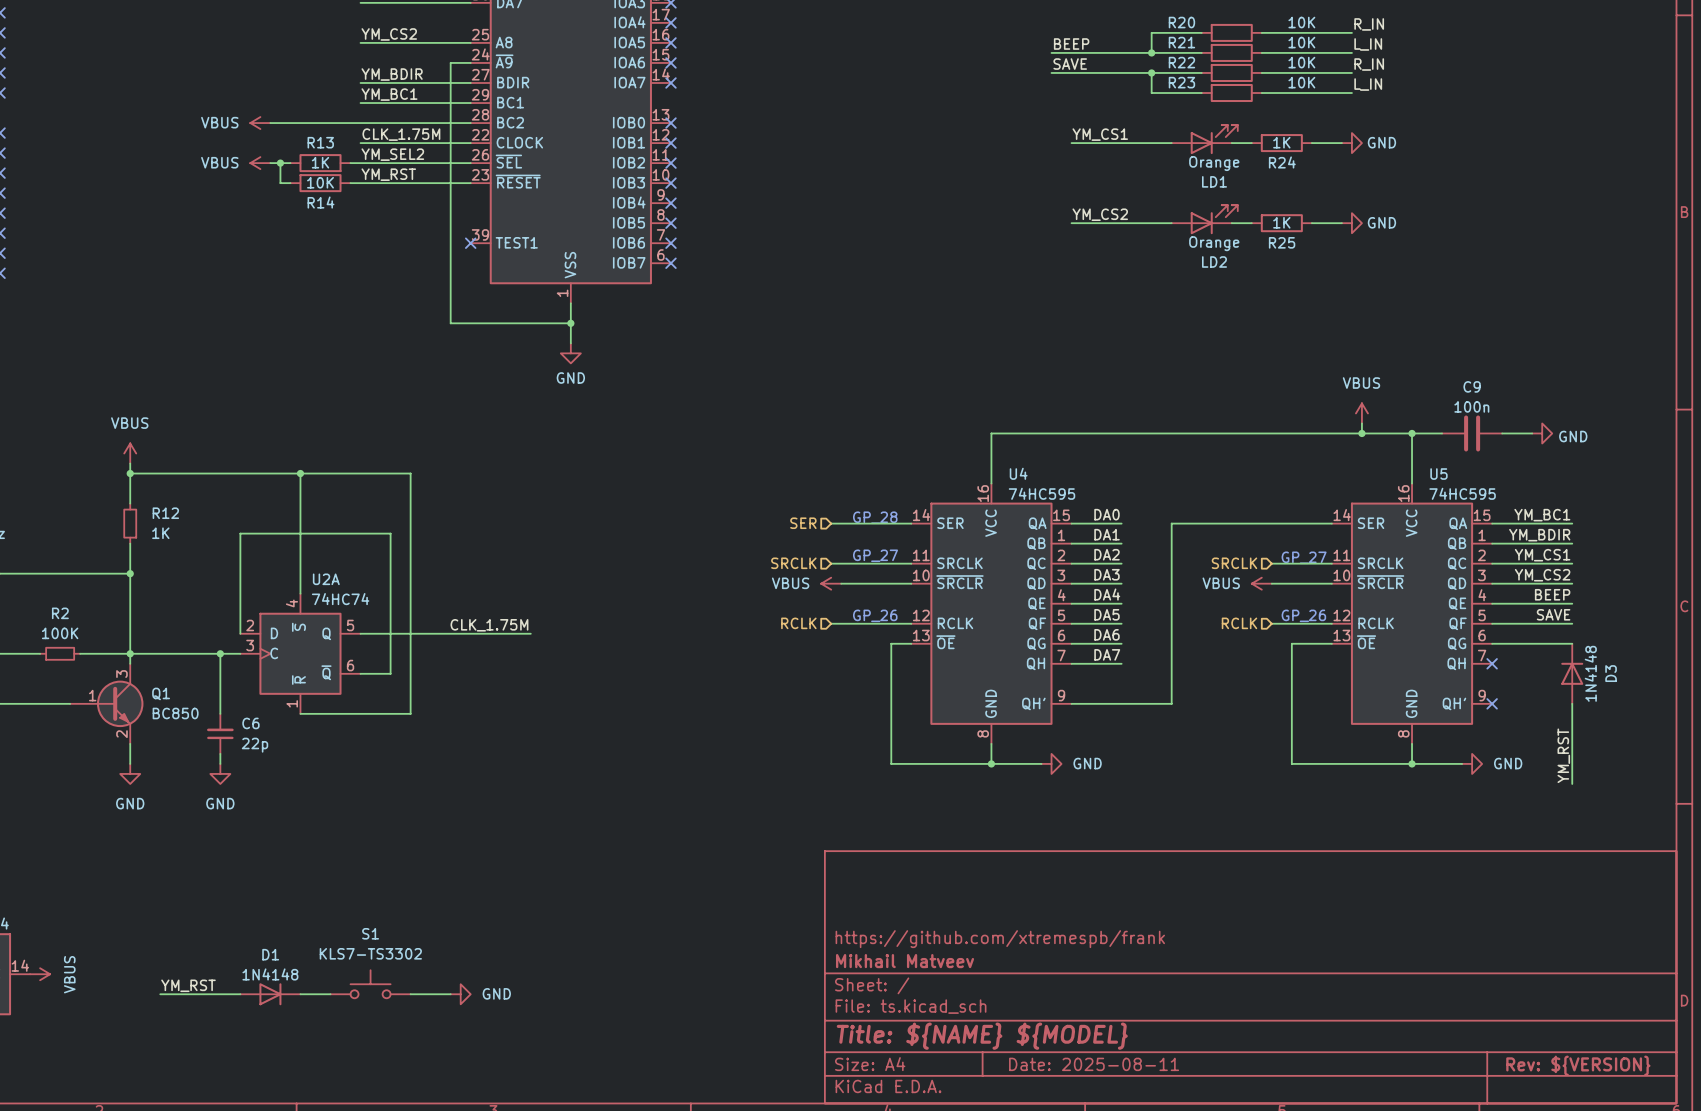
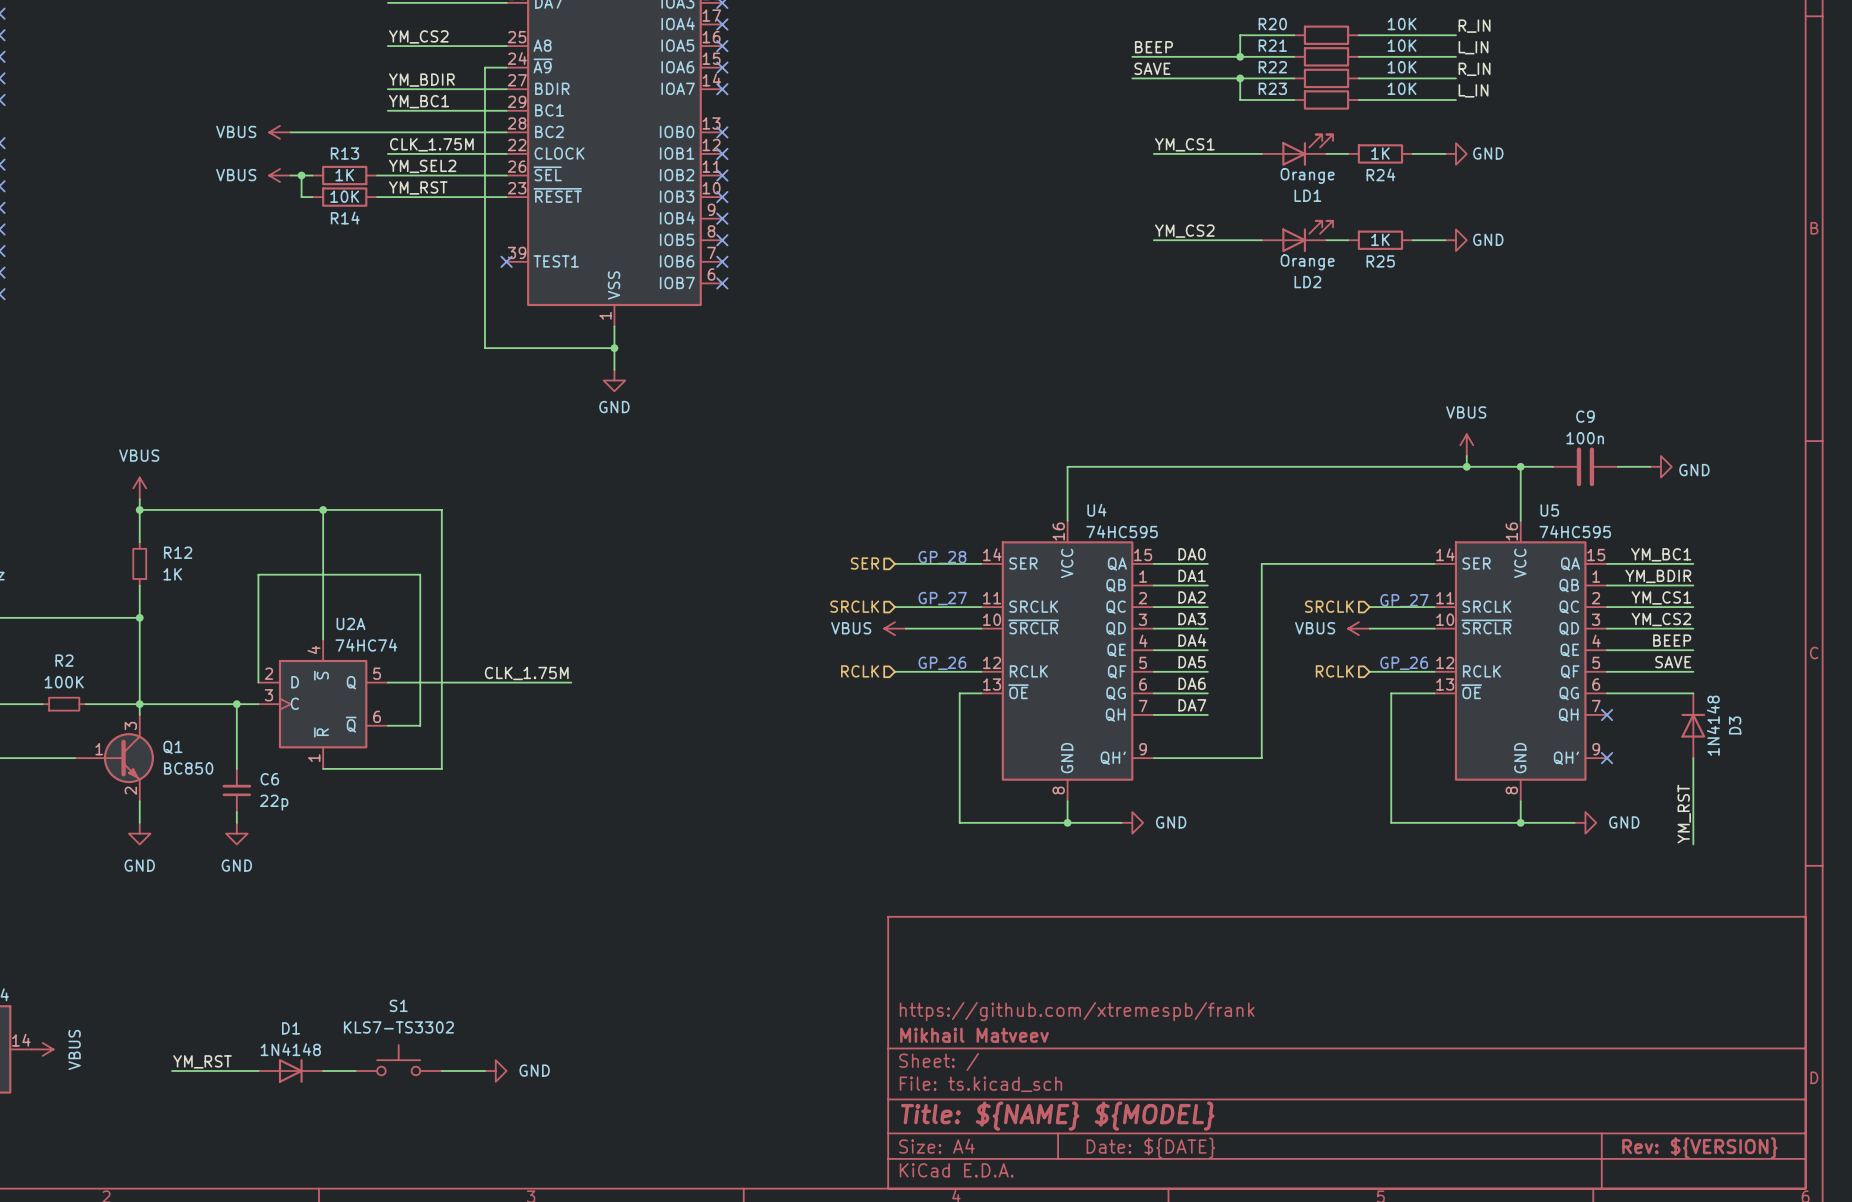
title block: Date: 2025-08-11 (1094, 1064) -> Date: ${DATE} (1150, 1148)

